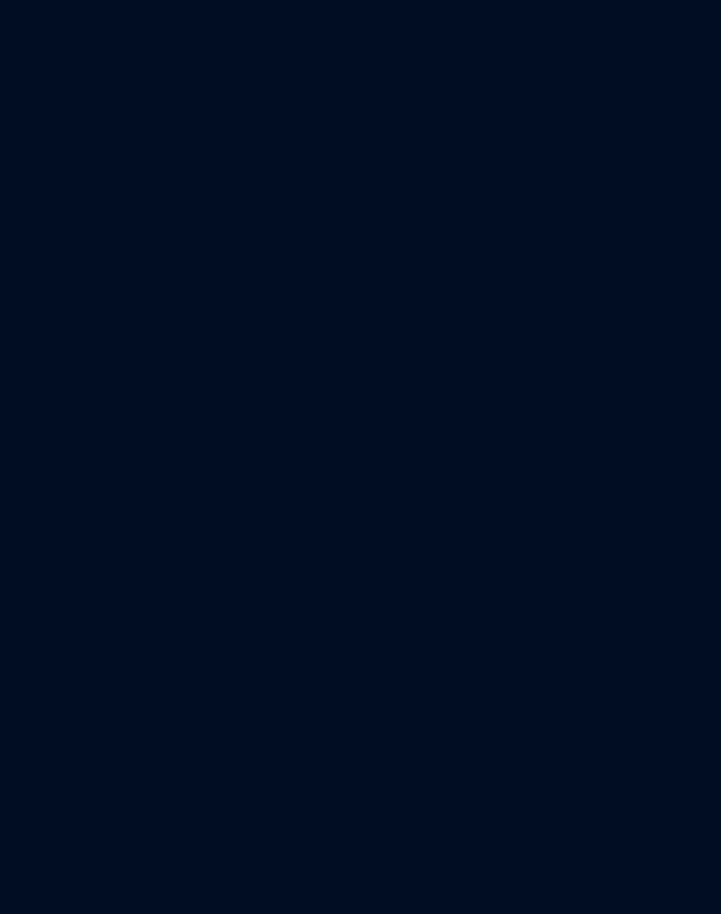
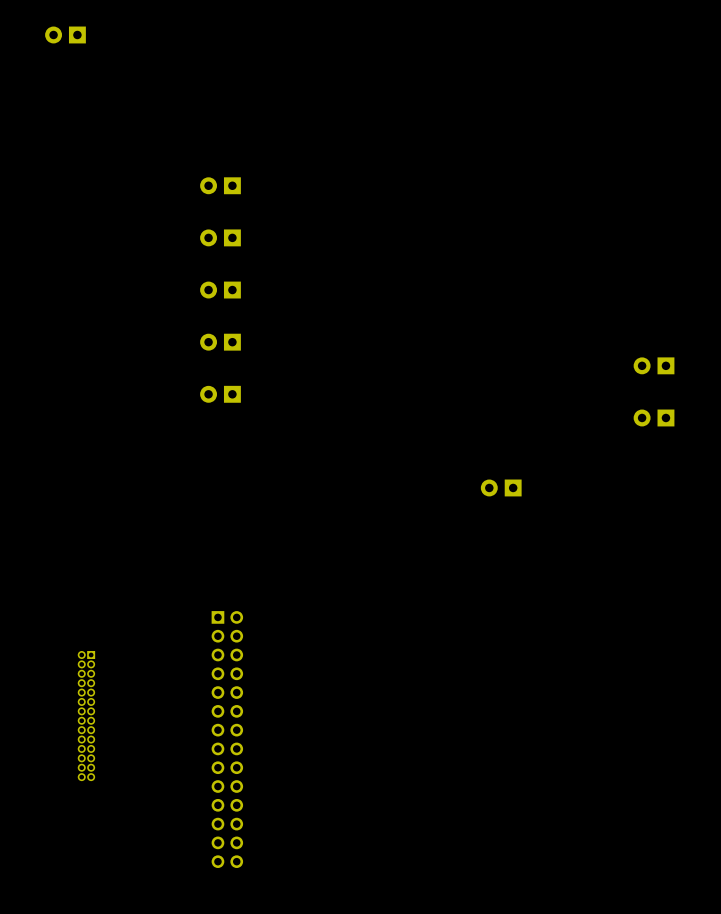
part: none -> (65, 34)
part: none -> (220, 185)
part: none -> (220, 237)
part: none -> (220, 290)
part: none -> (220, 342)
part: none -> (654, 365)
part: none -> (220, 394)
part: none -> (654, 417)
part: none -> (501, 487)
part: none -> (86, 716)
part: none -> (227, 739)

